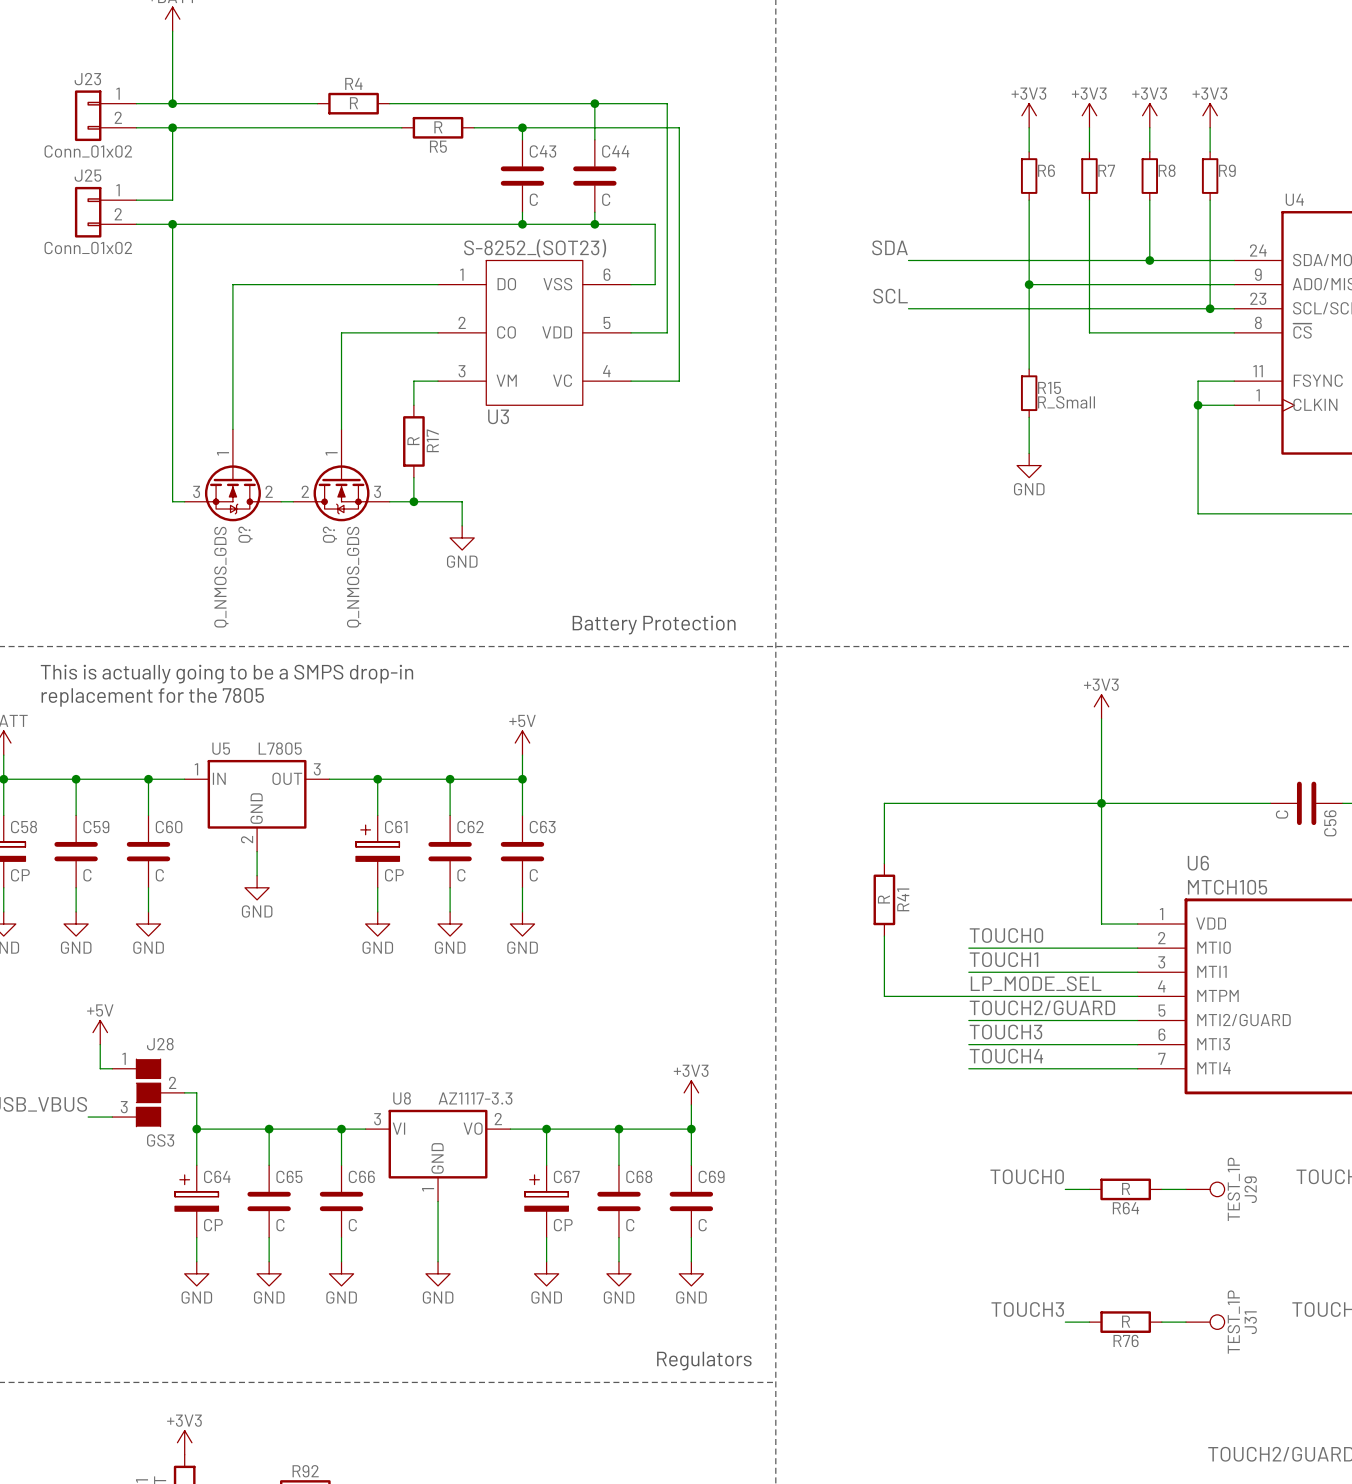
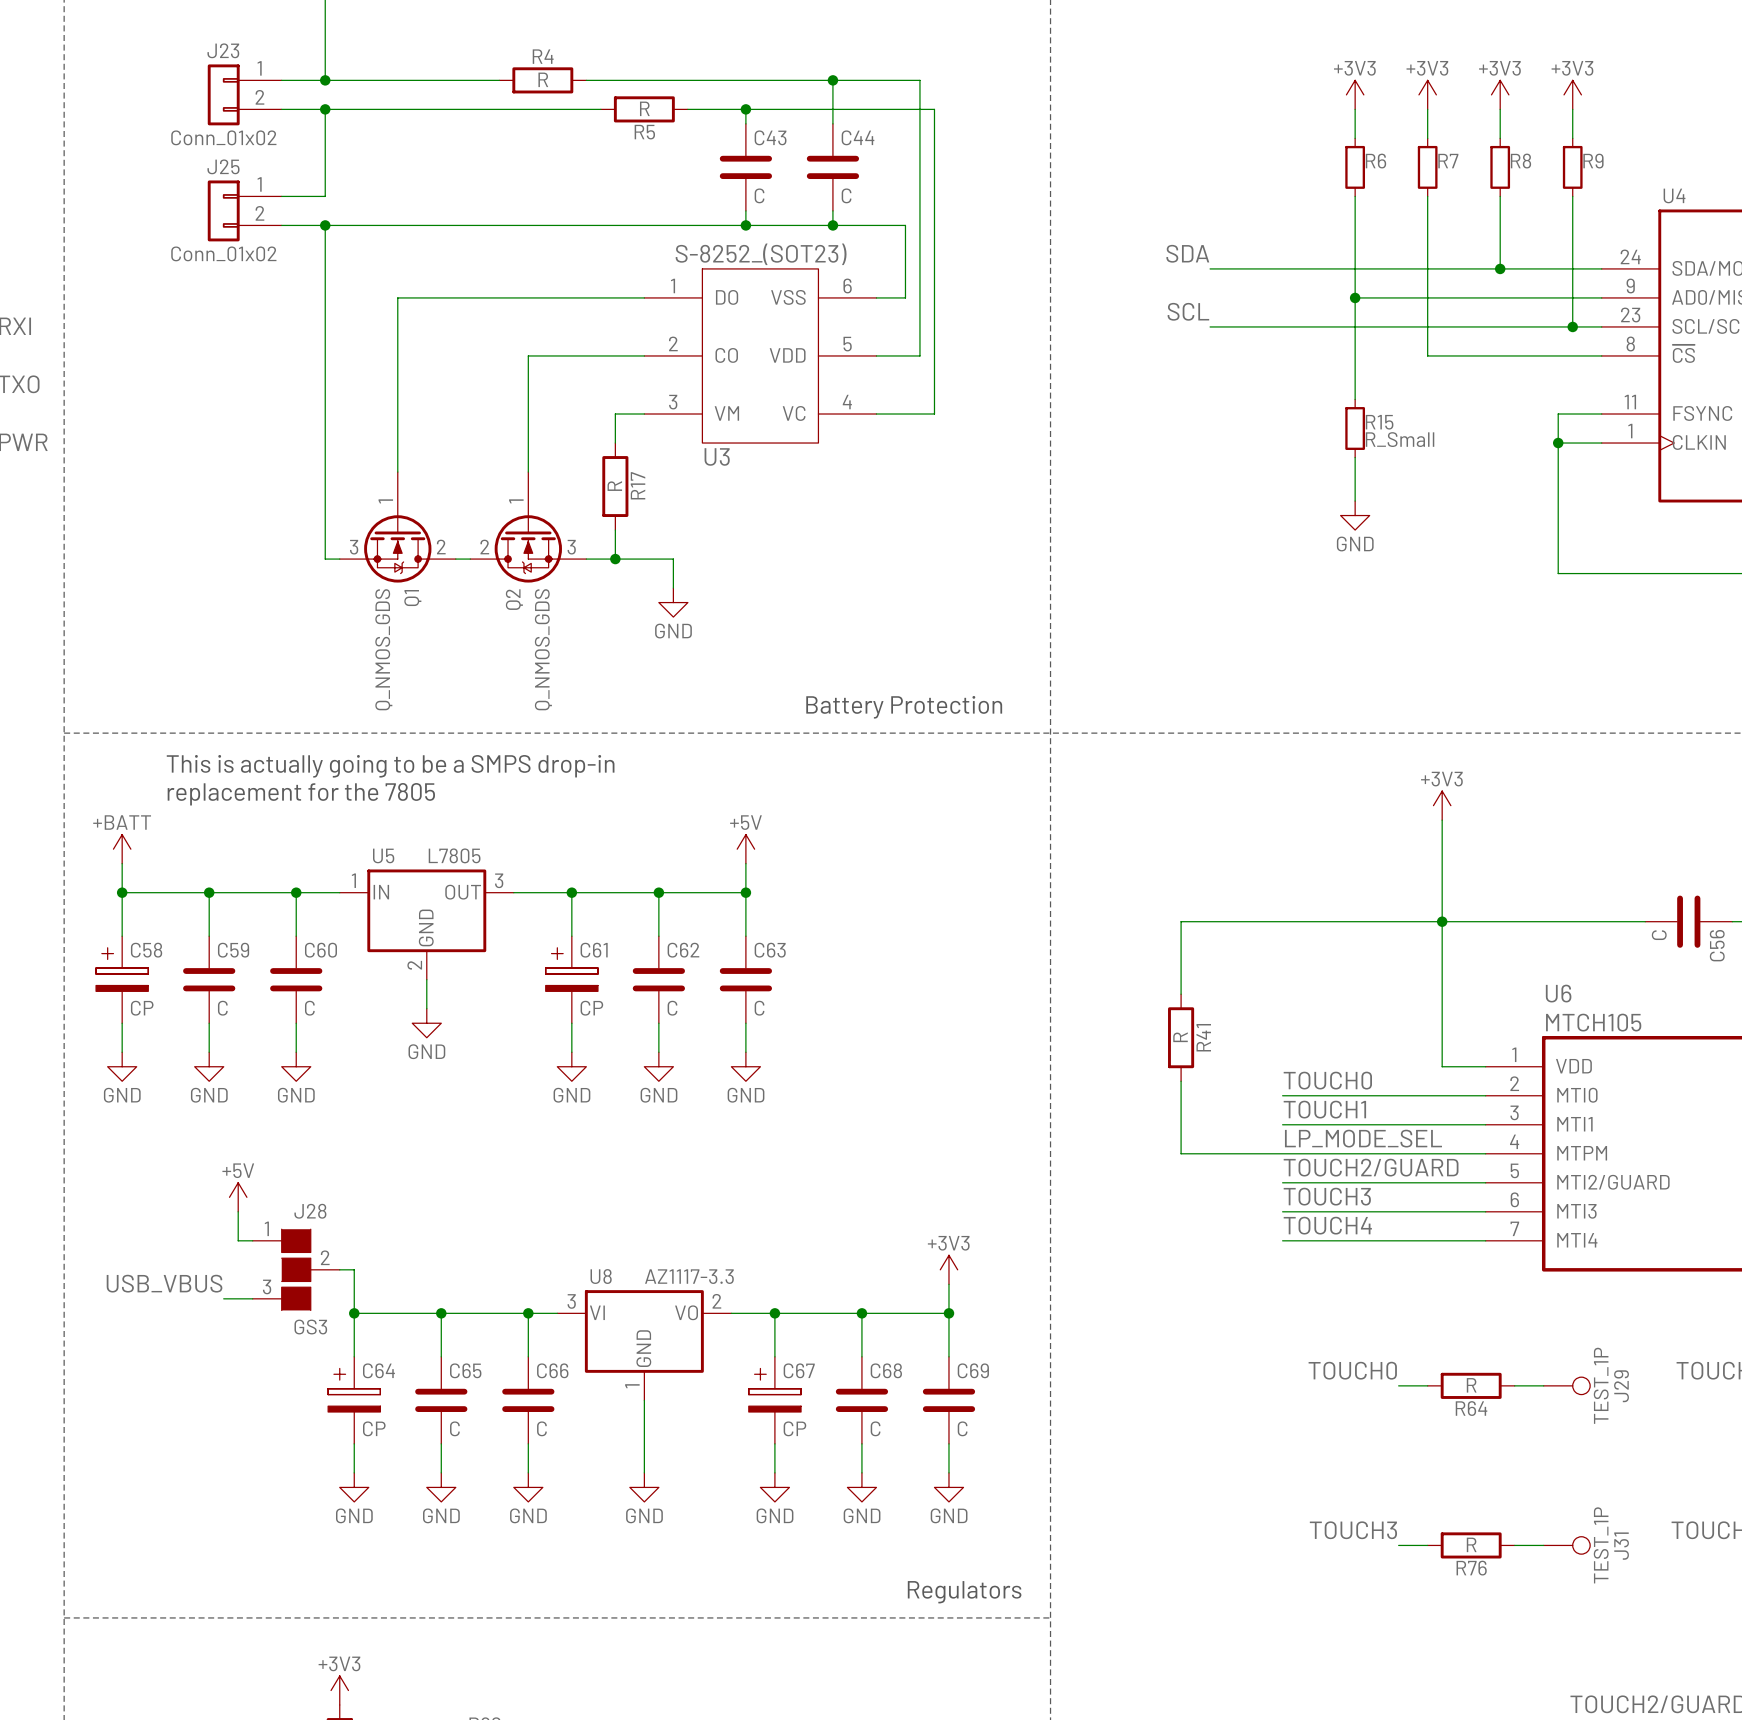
Q? name: Q? (245, 534) -> Q1 (412, 598)
Q? name: Q? (329, 534) -> Q2 (514, 599)

